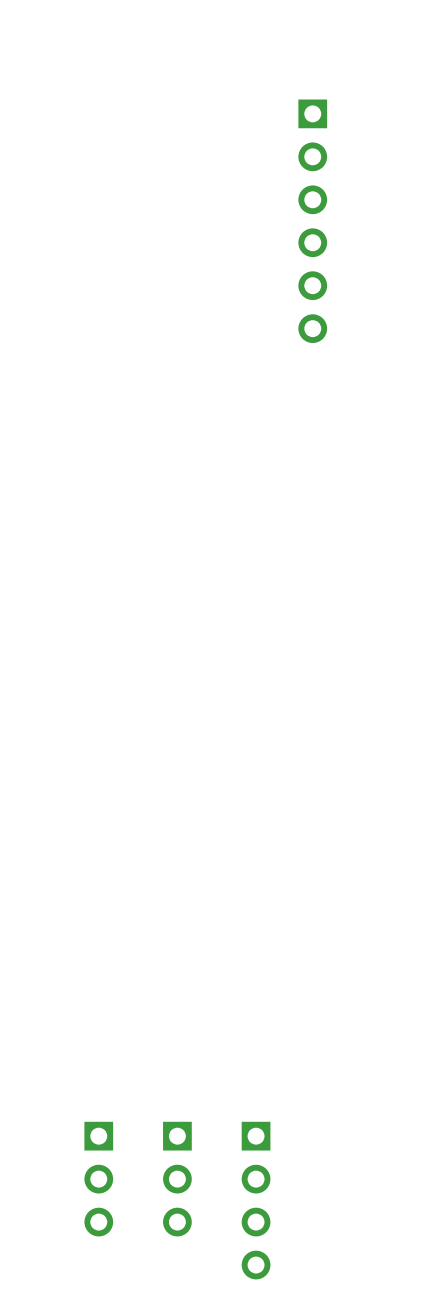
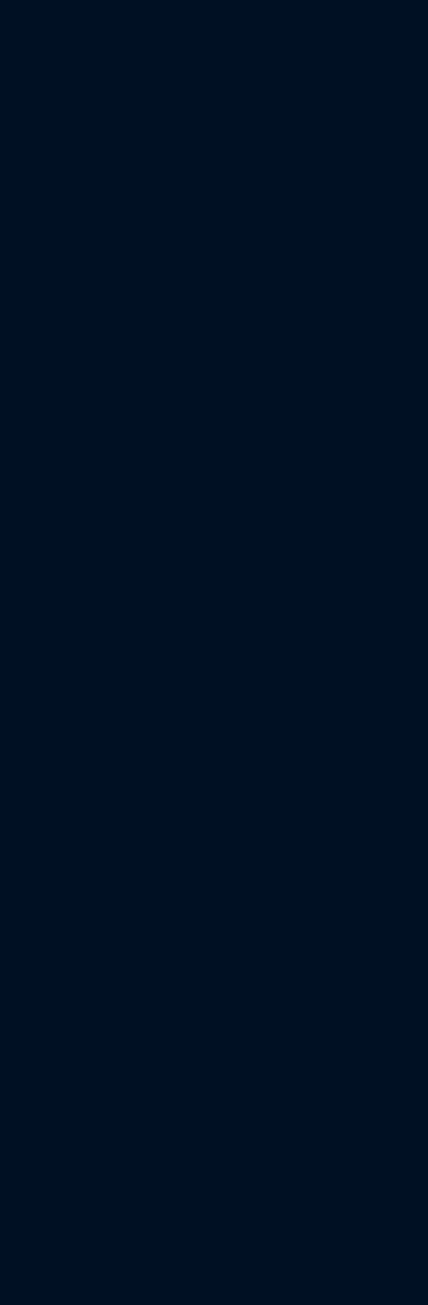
part: (312, 221) -> none
part: (98, 1179) -> none
part: (177, 1179) -> none
part: (256, 1200) -> none

